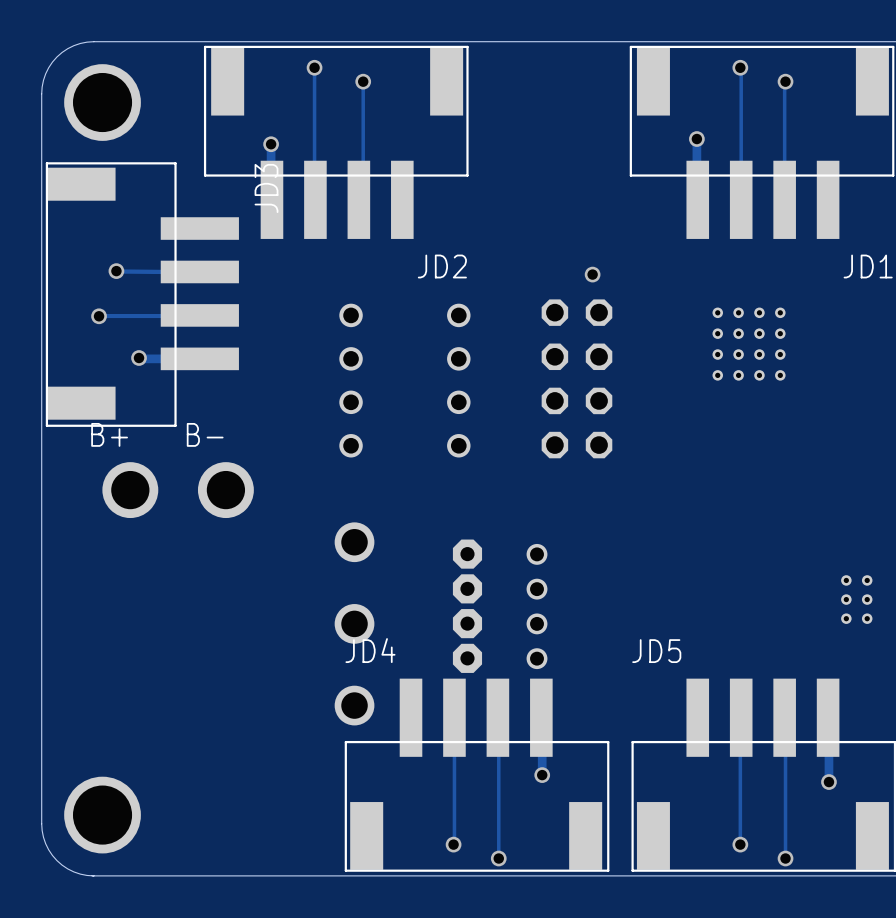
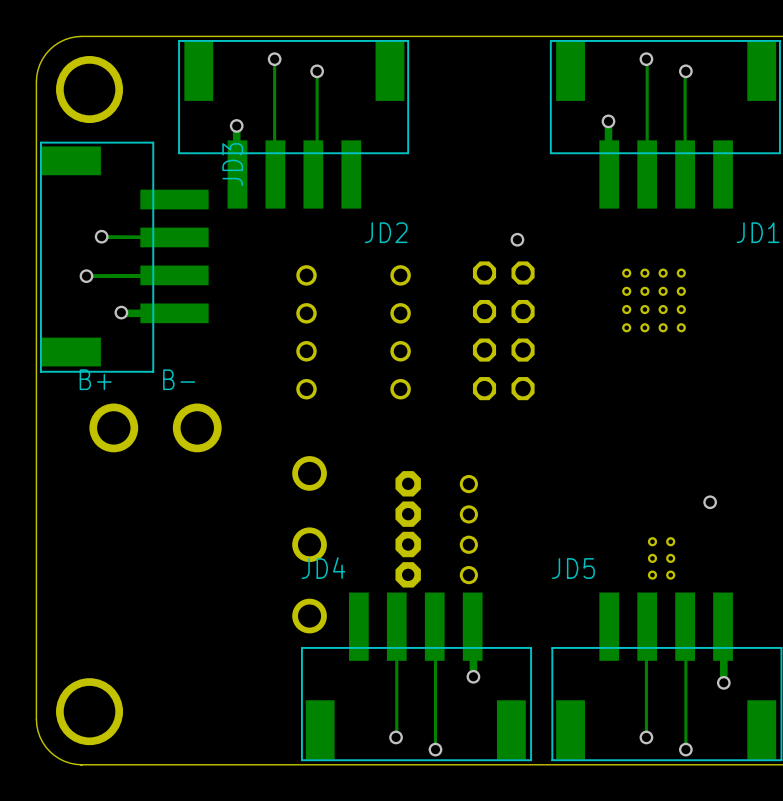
via: none -> (710, 502)
part position: (856, 599) -> (661, 558)

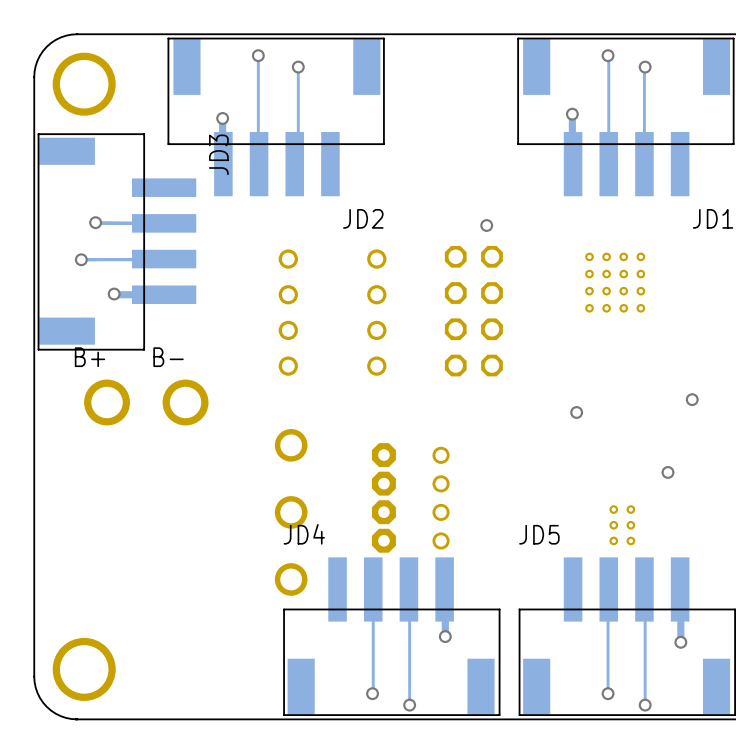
via: none -> (692, 399)
via: none -> (576, 412)

